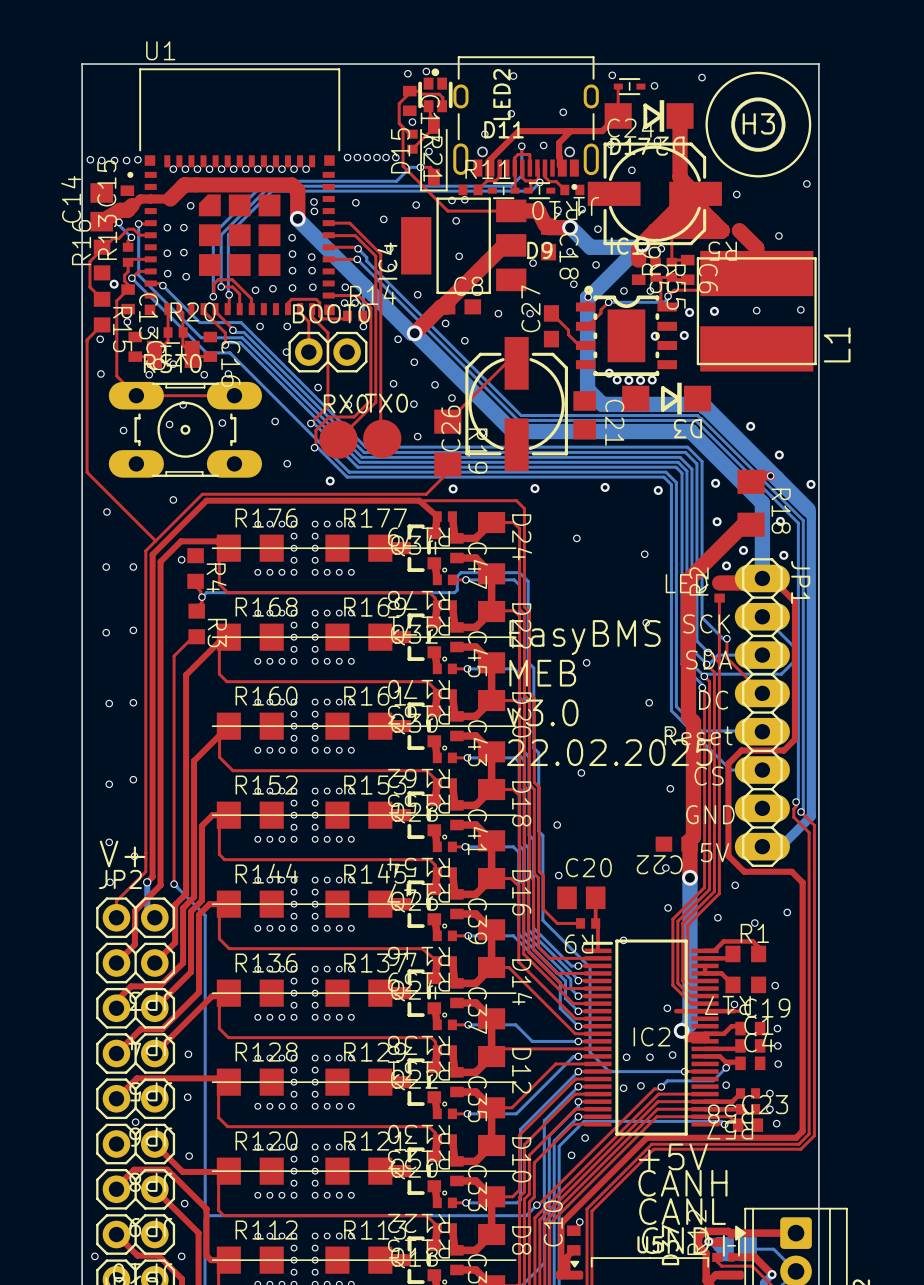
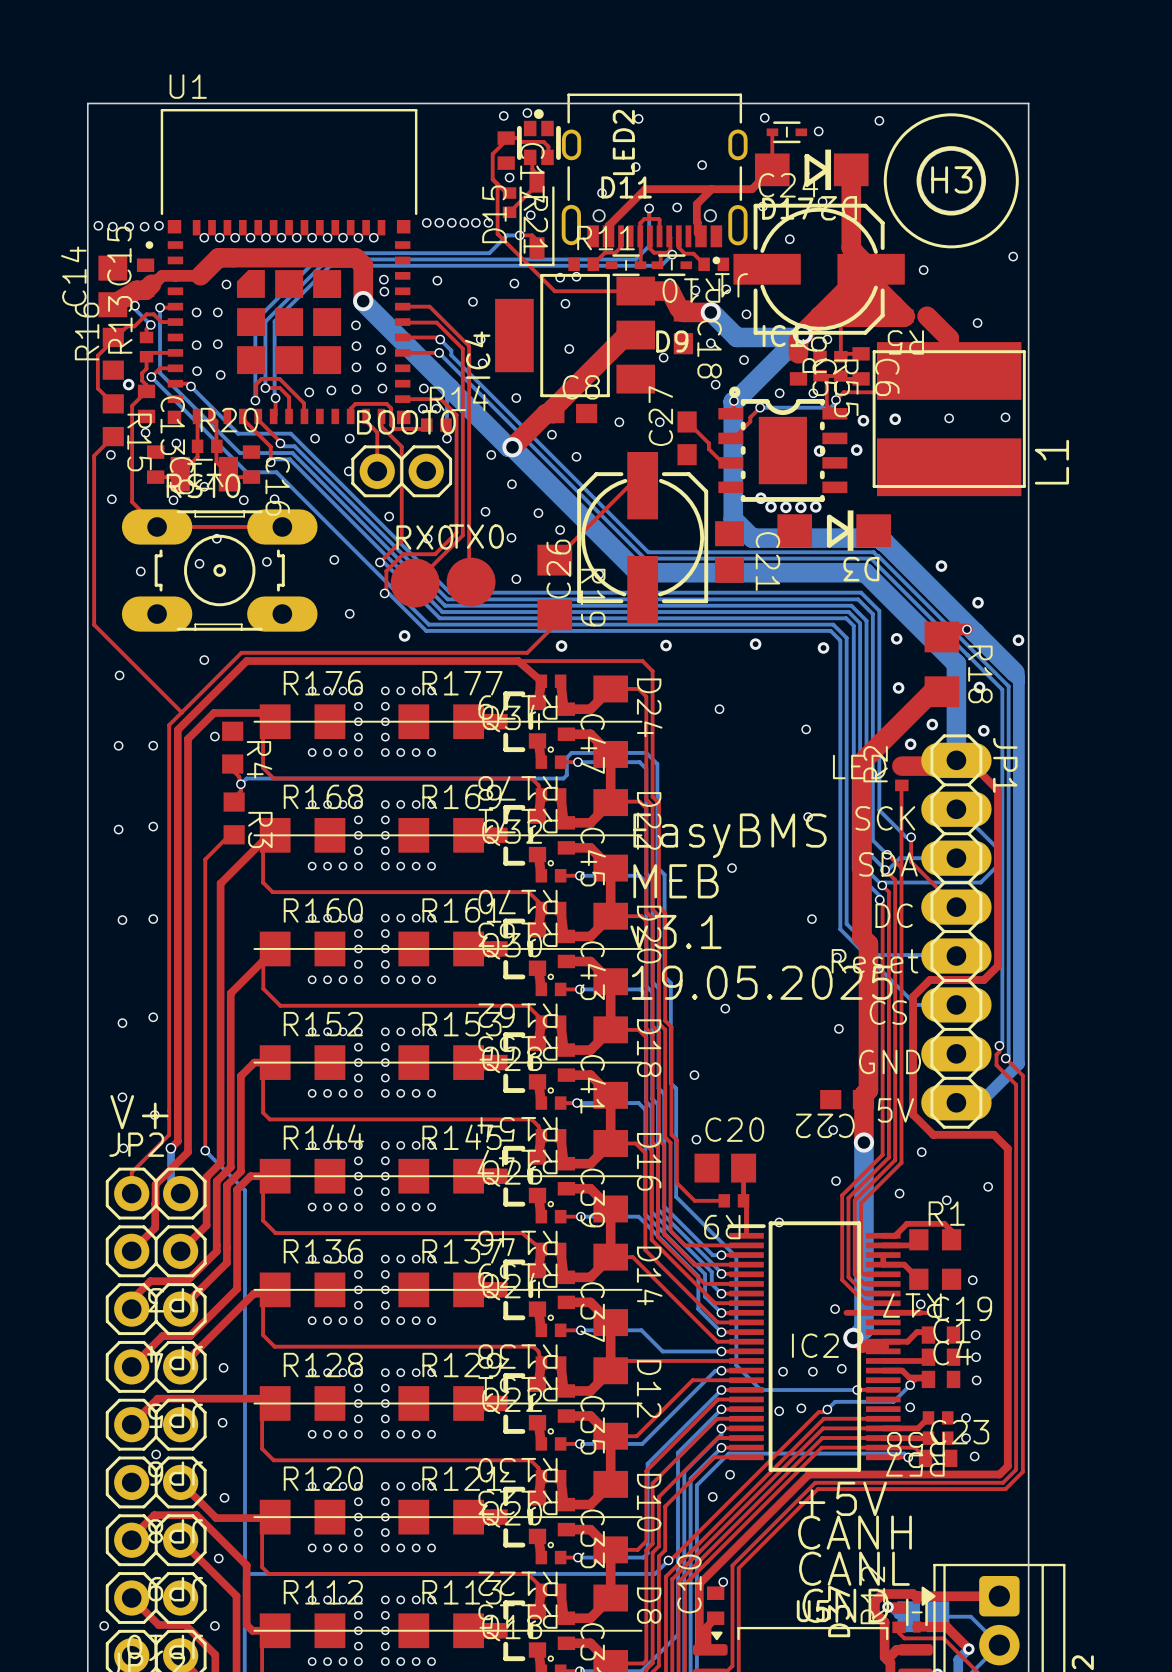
text: v3.0 (542, 712) -> v3.1 (675, 932)
text: 22.02.2025 (609, 752) -> 19.05.2025 (762, 982)

